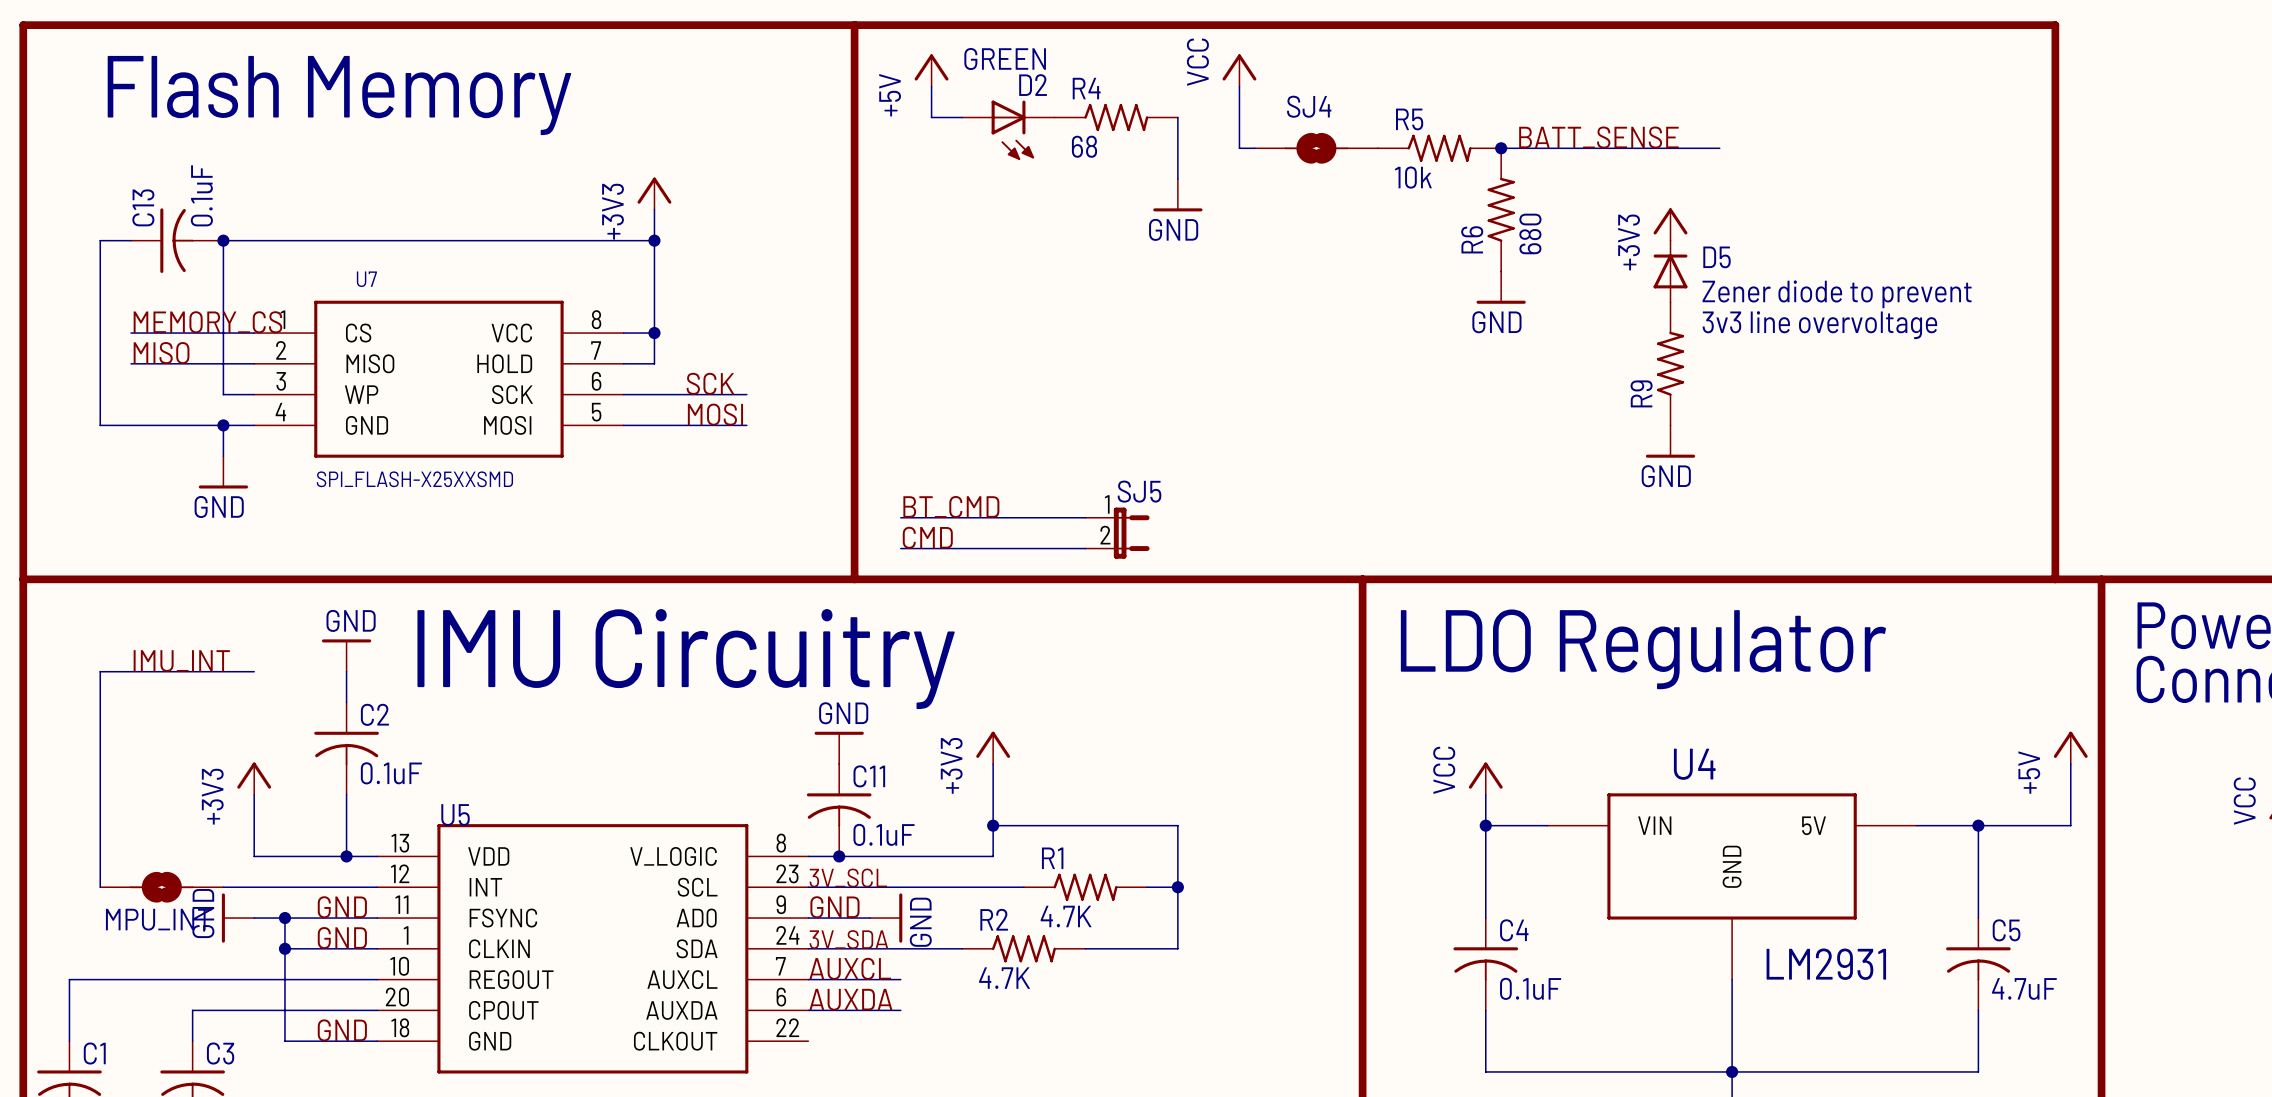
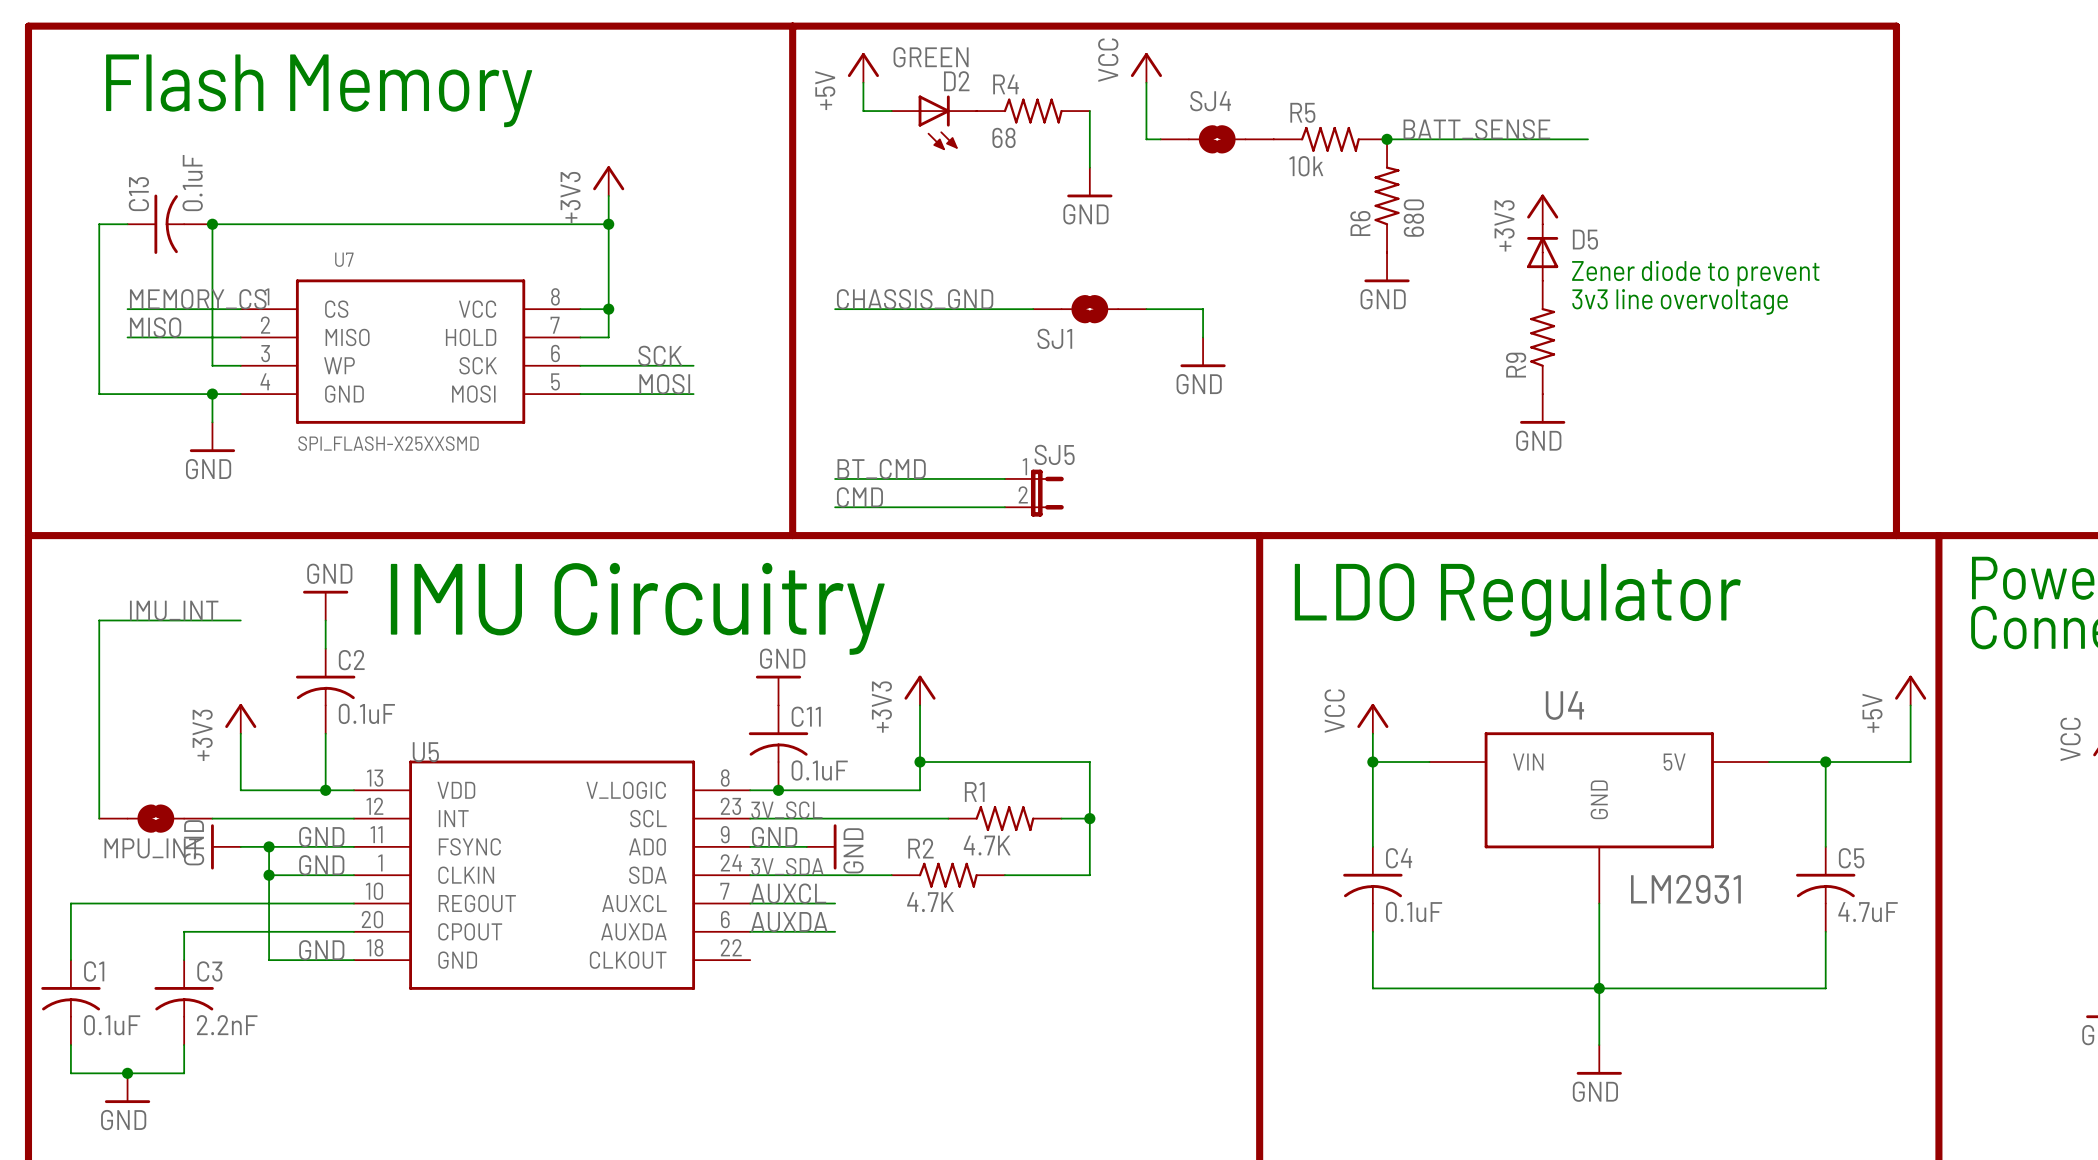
label: none -> CHASSIS_GND (915, 299)
wire: none -> (835, 309) (1033, 309)
SJ1: none -> (1089, 309)
wire: none -> (1146, 309) (1203, 309) (1203, 337)
power symbol: none -> GND (1203, 352)

